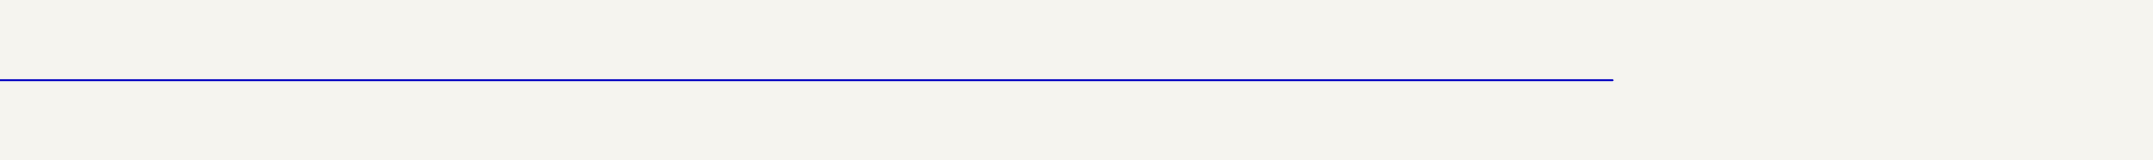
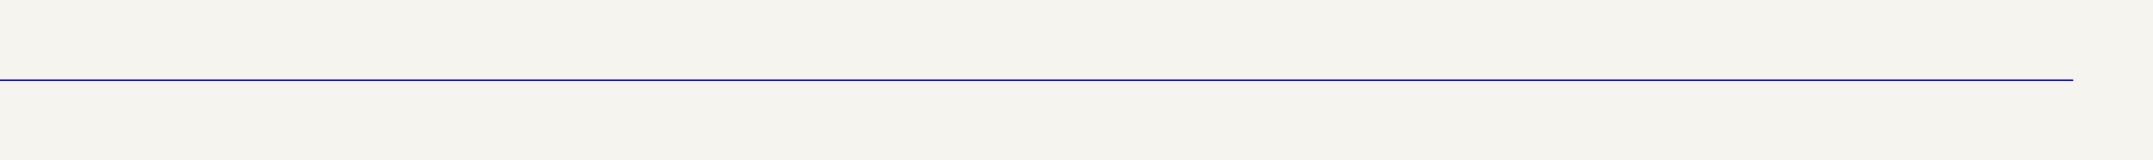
line: none -> (1612, 80) (2072, 80)

